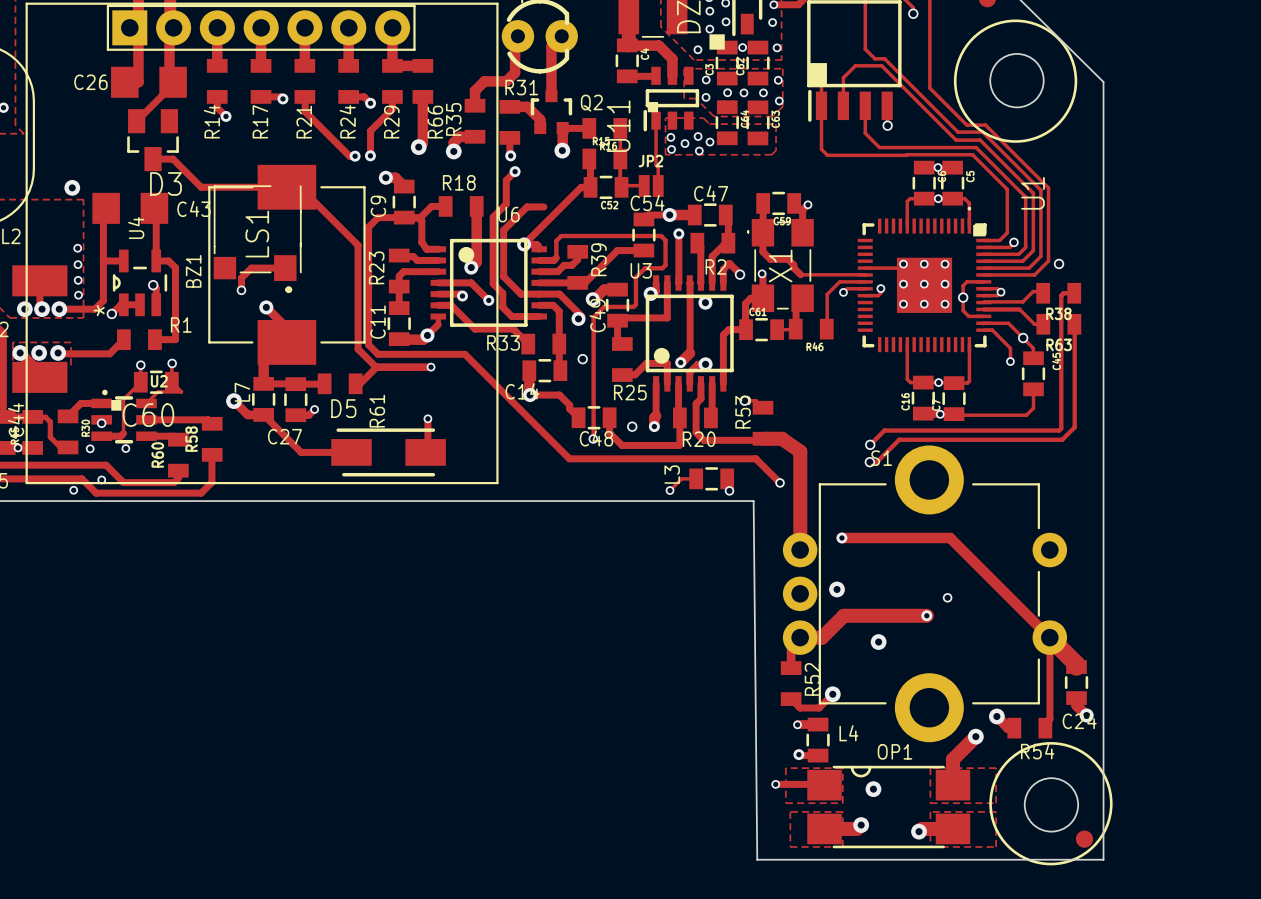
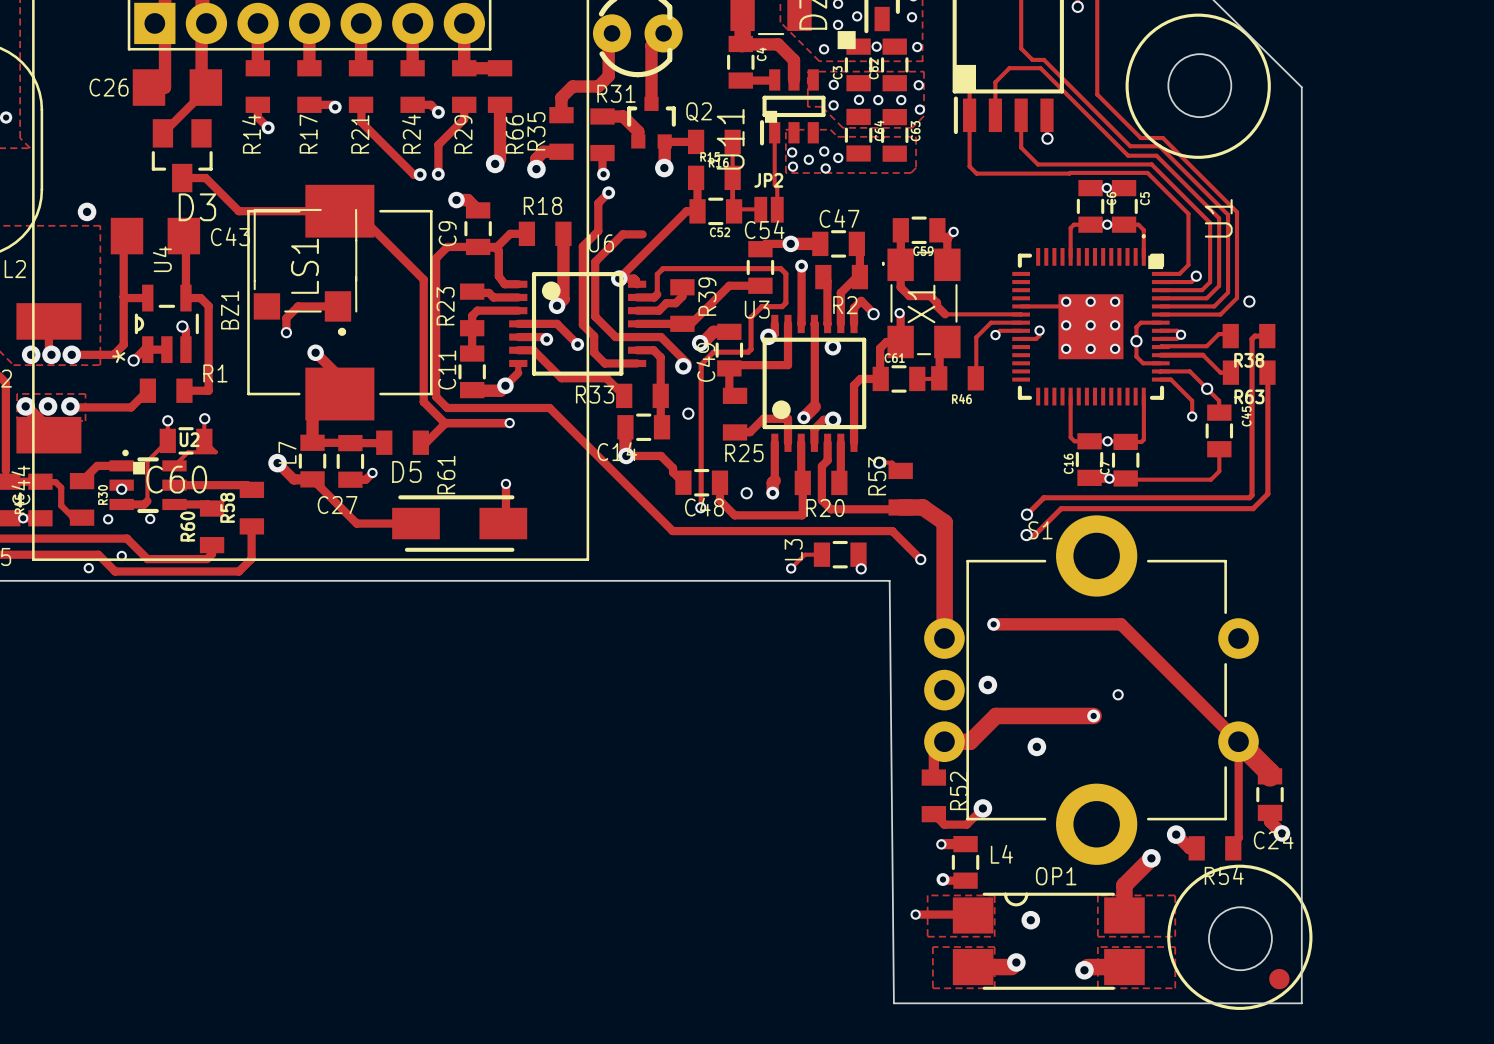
via: (77, 248) -> none
via: (78, 264) -> none
via: (78, 280) -> none
via: (78, 295) -> none

